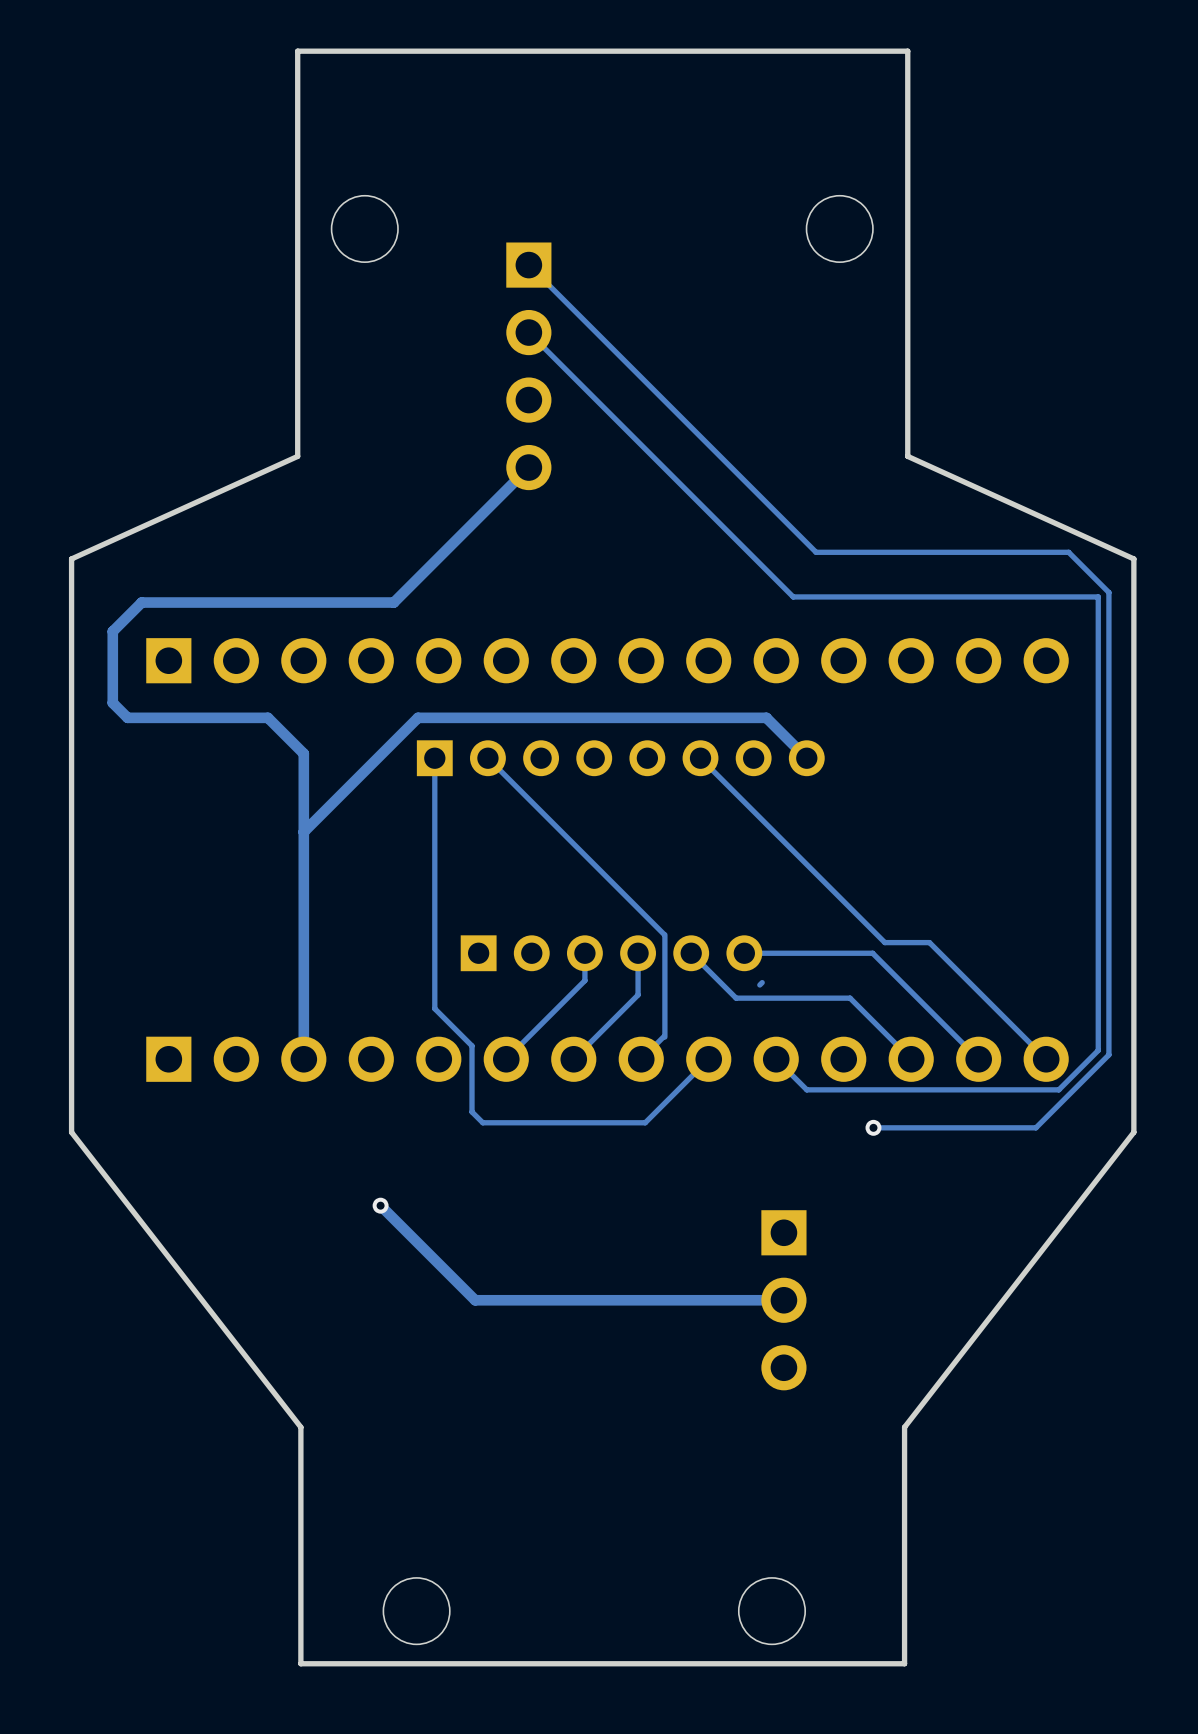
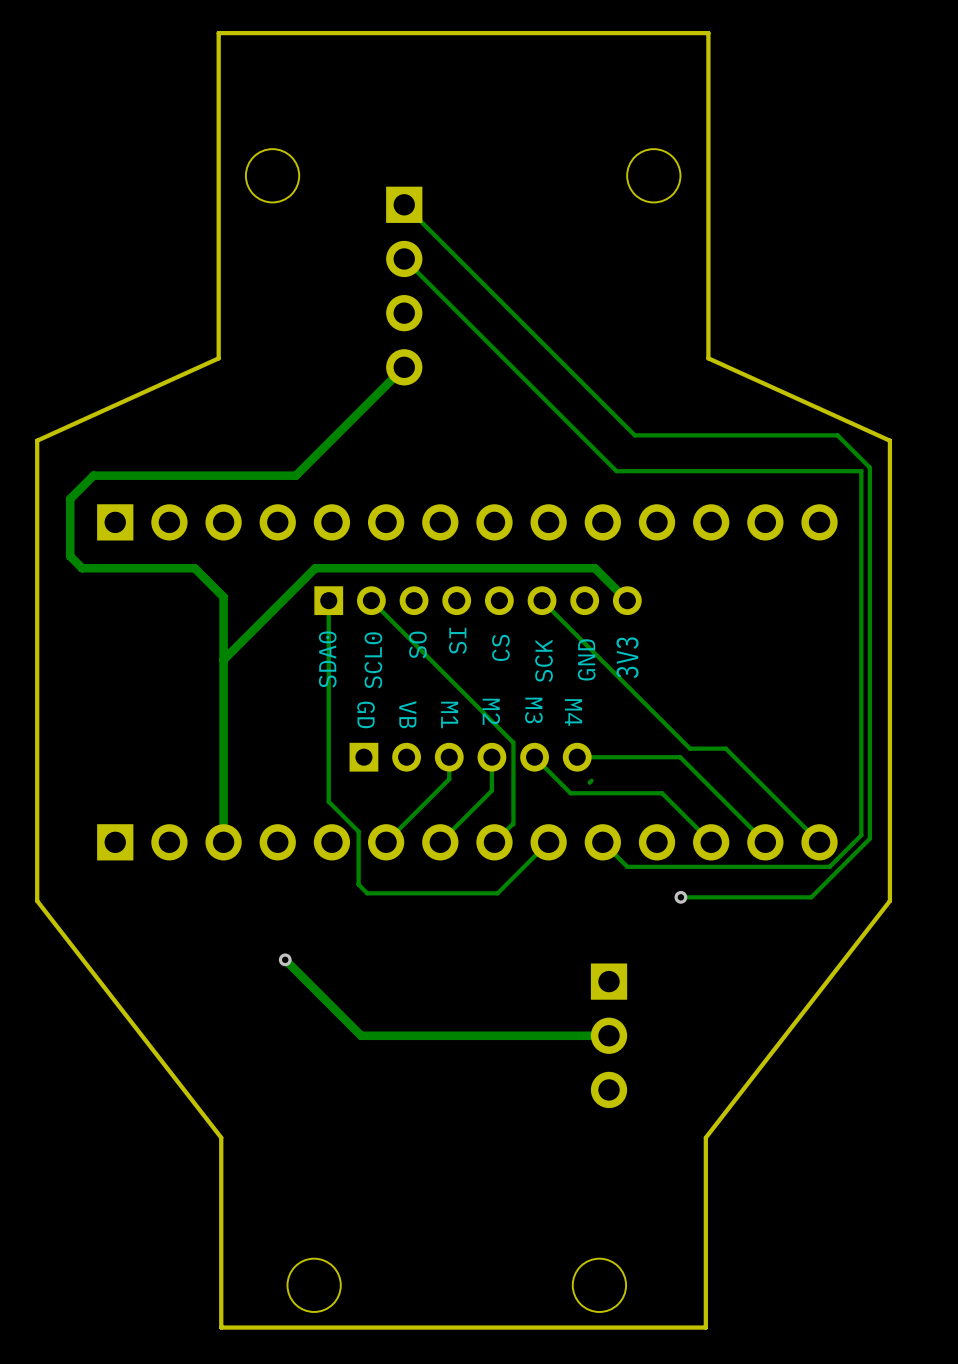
text: none -> SI (457, 640)
text: none -> SO (417, 644)
text: none -> CS (500, 647)
text: none -> 3V3 (627, 657)
text: none -> SDA0 (327, 659)
text: none -> SCL0 (373, 660)
text: none -> SCK (544, 660)
text: none -> GND (586, 659)
text: none -> M3 (533, 710)
text: none -> M2 (491, 711)
text: none -> M4 (573, 712)
text: none -> GD (366, 714)
text: none -> VB (407, 714)
text: none -> M1 (449, 714)

